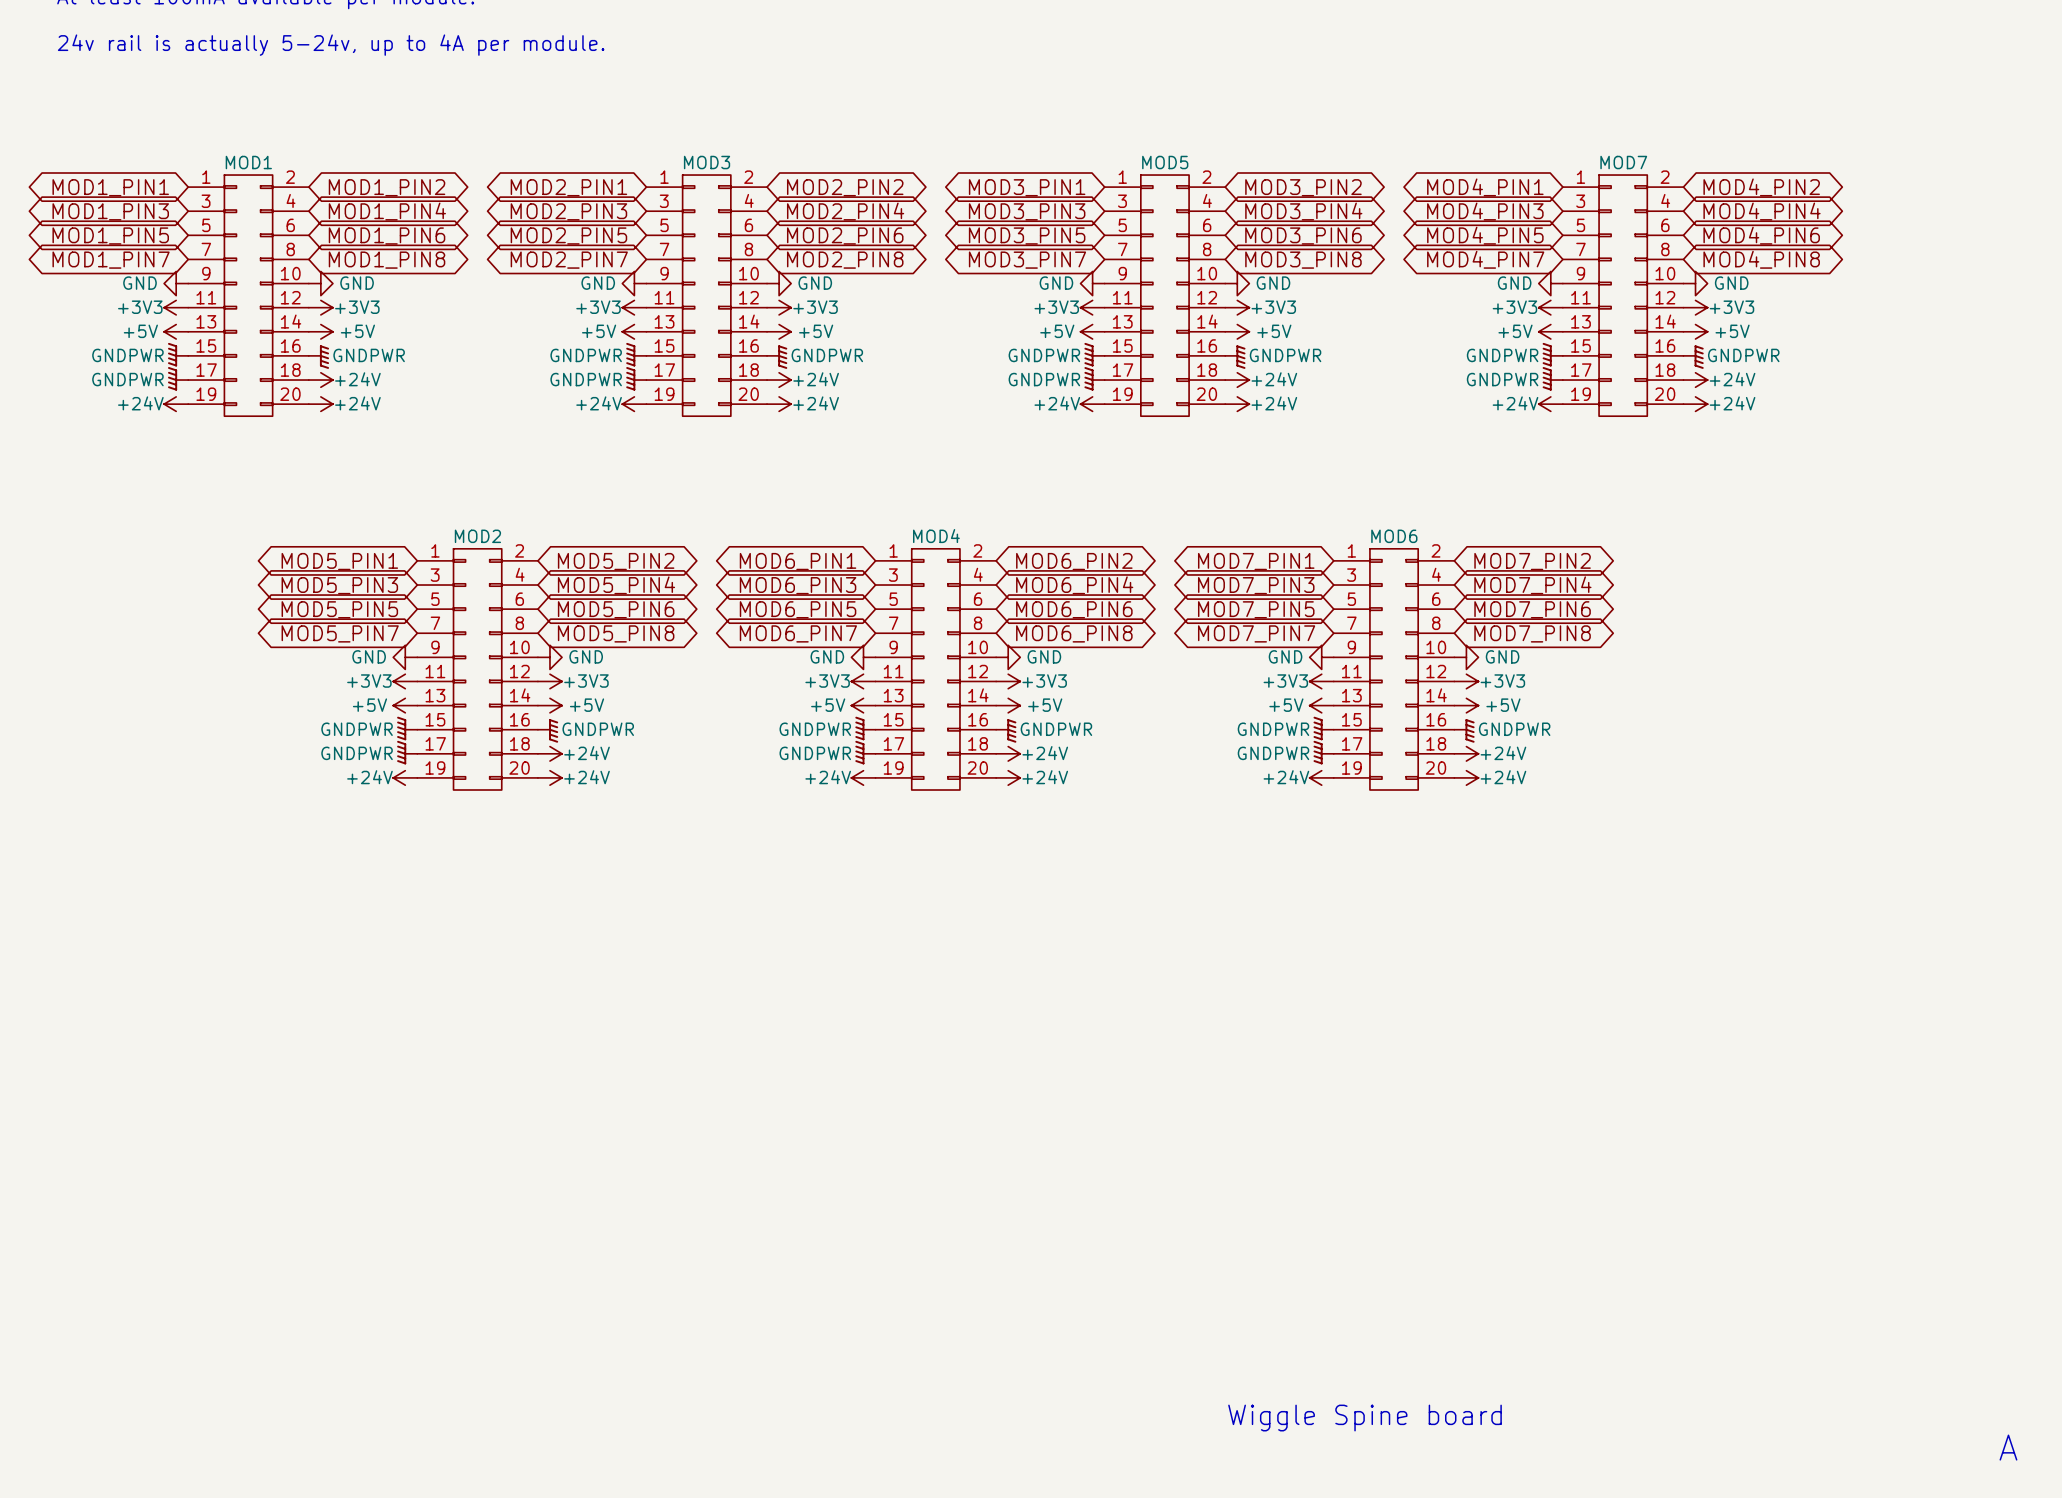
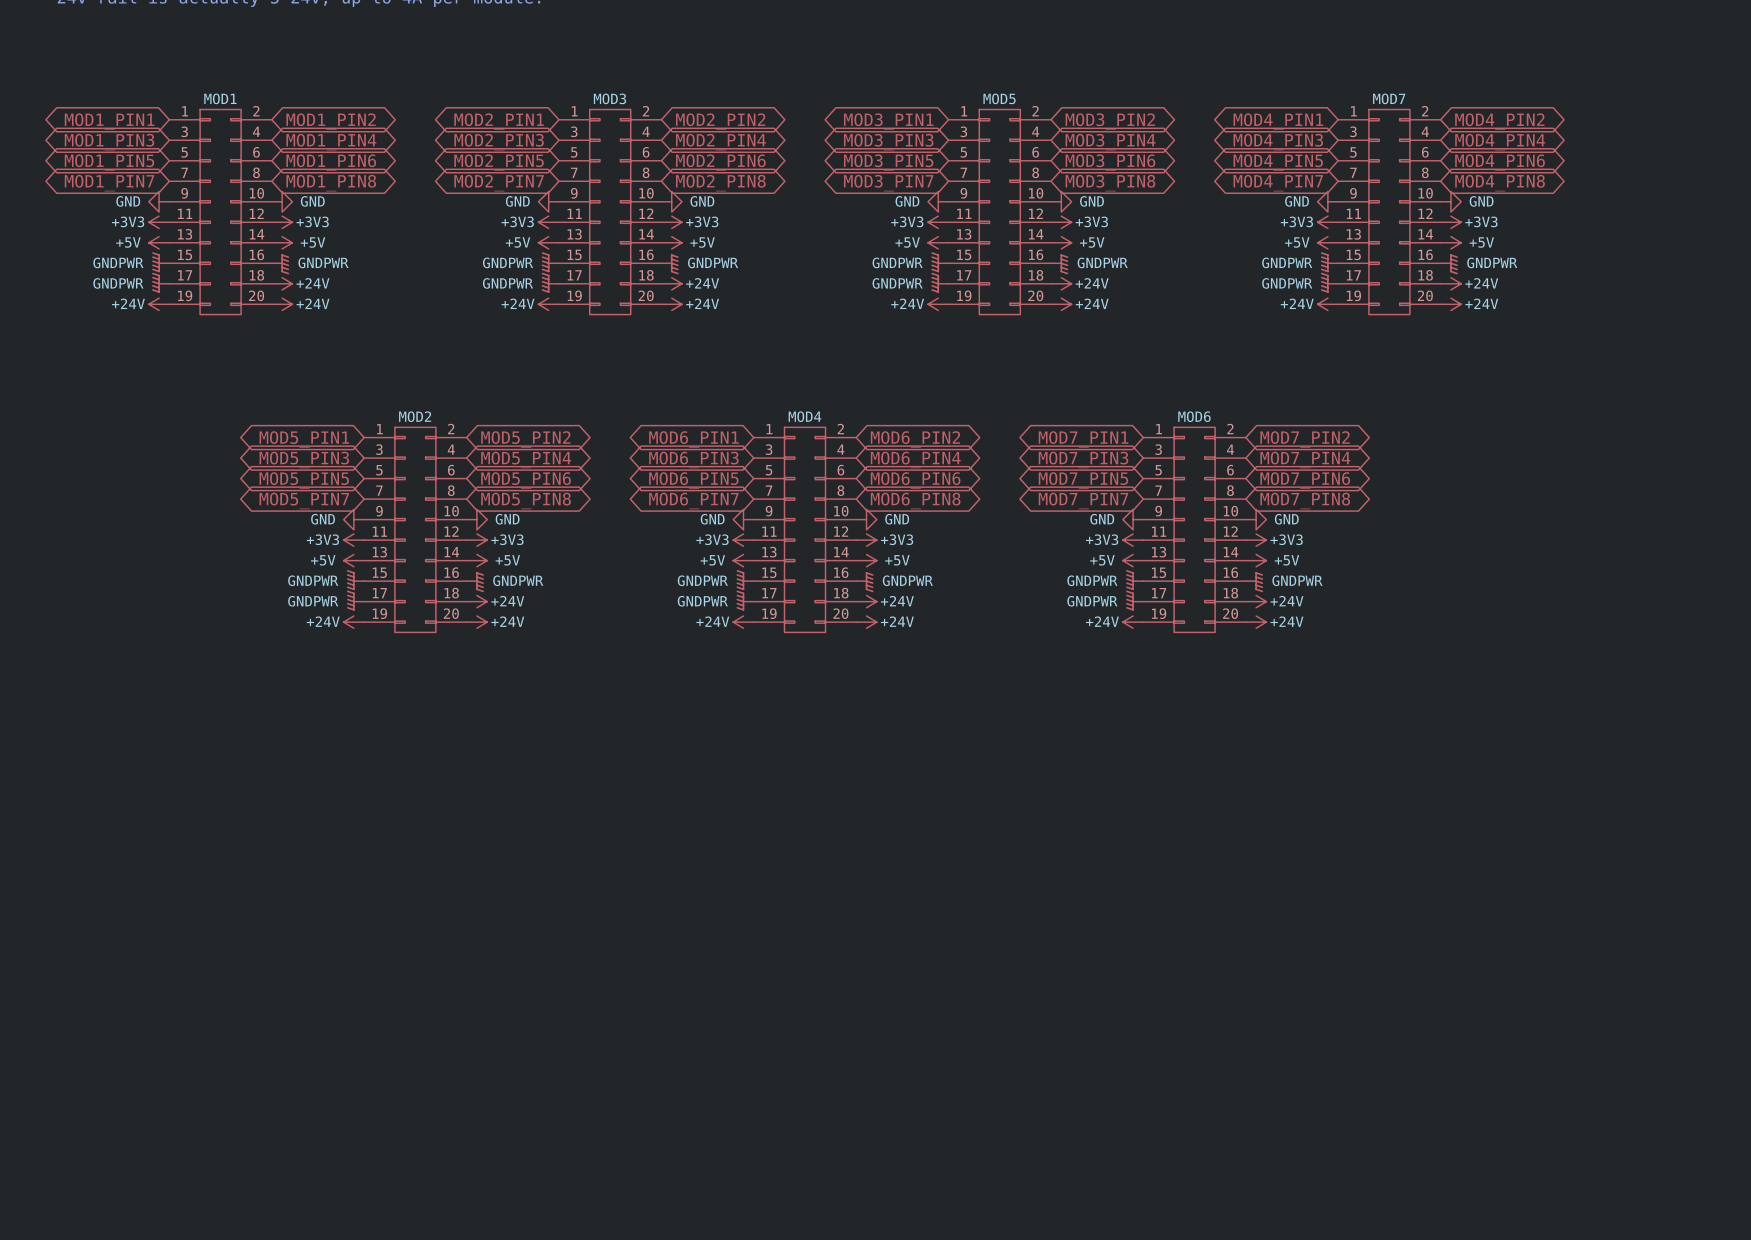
text: Wiggle Spine board (1365, 1418) -> none
text: A (2008, 1447) -> none

